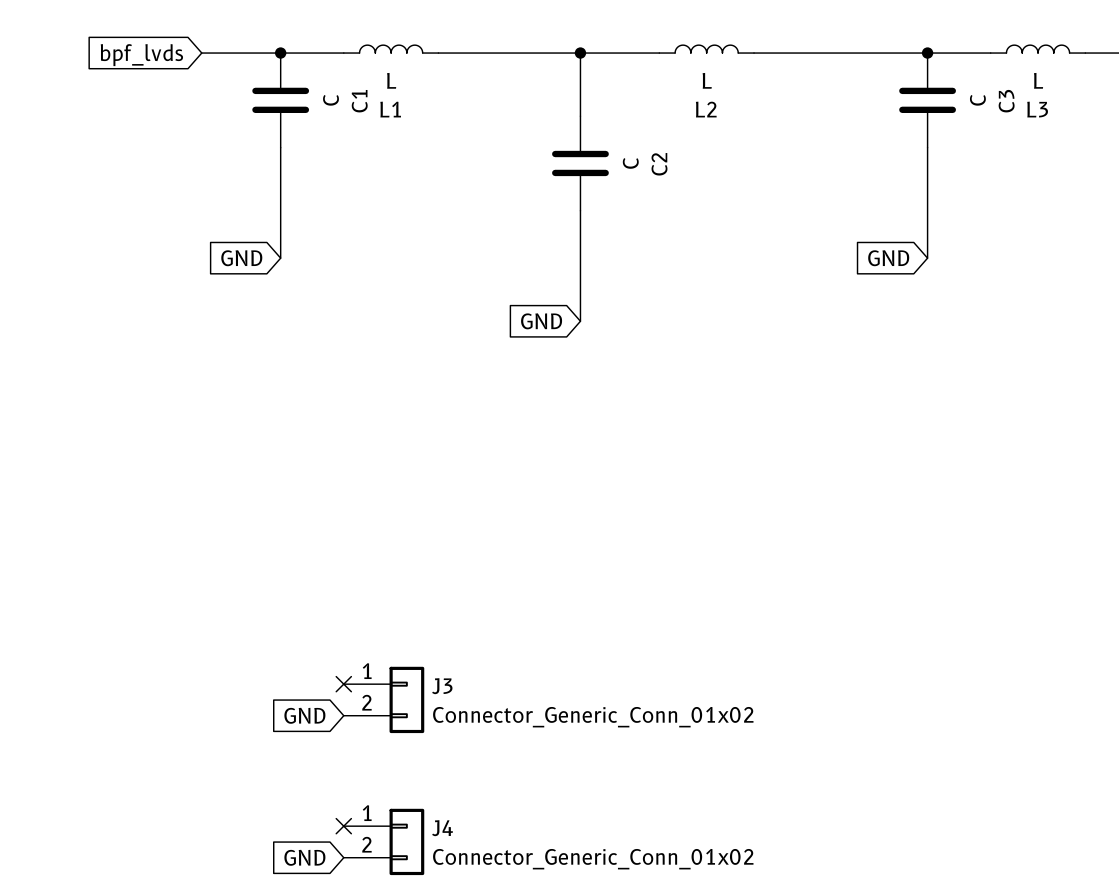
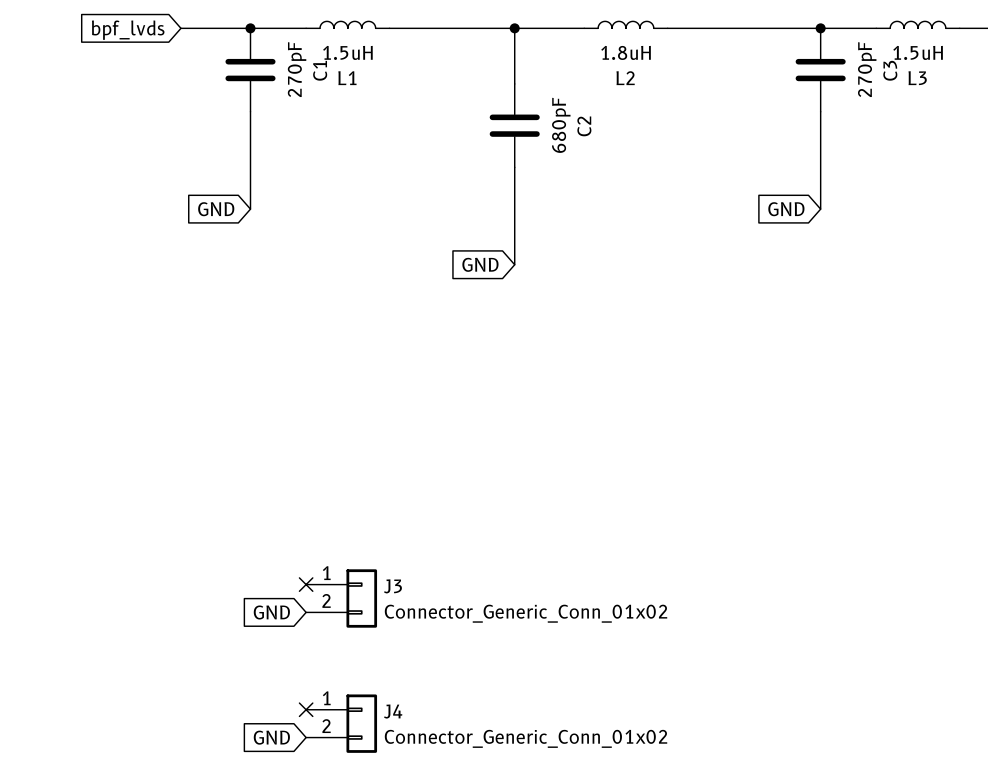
L1 value: L (391, 80) -> 1.5uH (347, 52)
L2 value: L (707, 80) -> 1.8uH (626, 52)
L3 value: L (1038, 80) -> 1.5uH (918, 52)
C1 value: C (330, 100) -> 270pF (297, 69)
C3 value: C (977, 100) -> 270pF (867, 69)
C2 value: C (630, 163) -> 680pF (561, 125)

